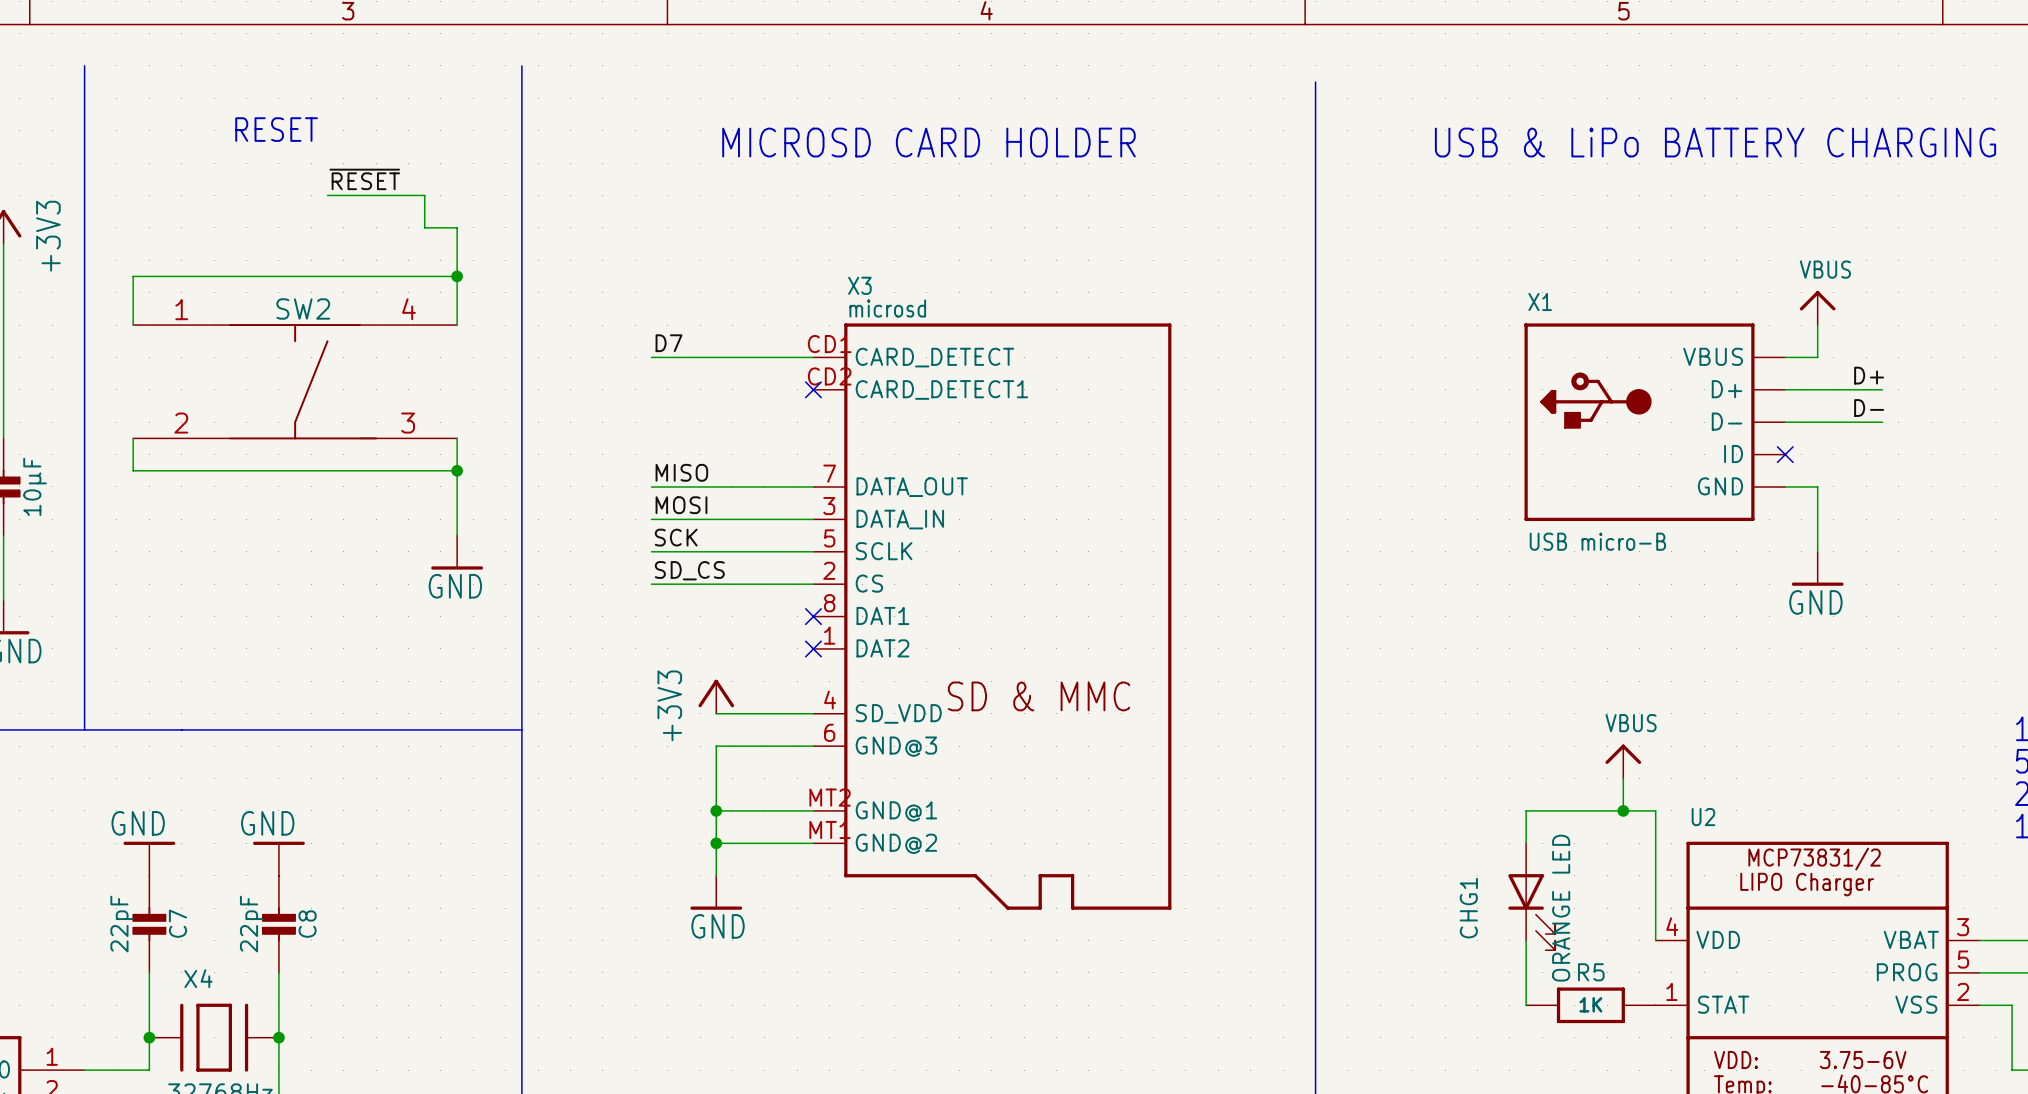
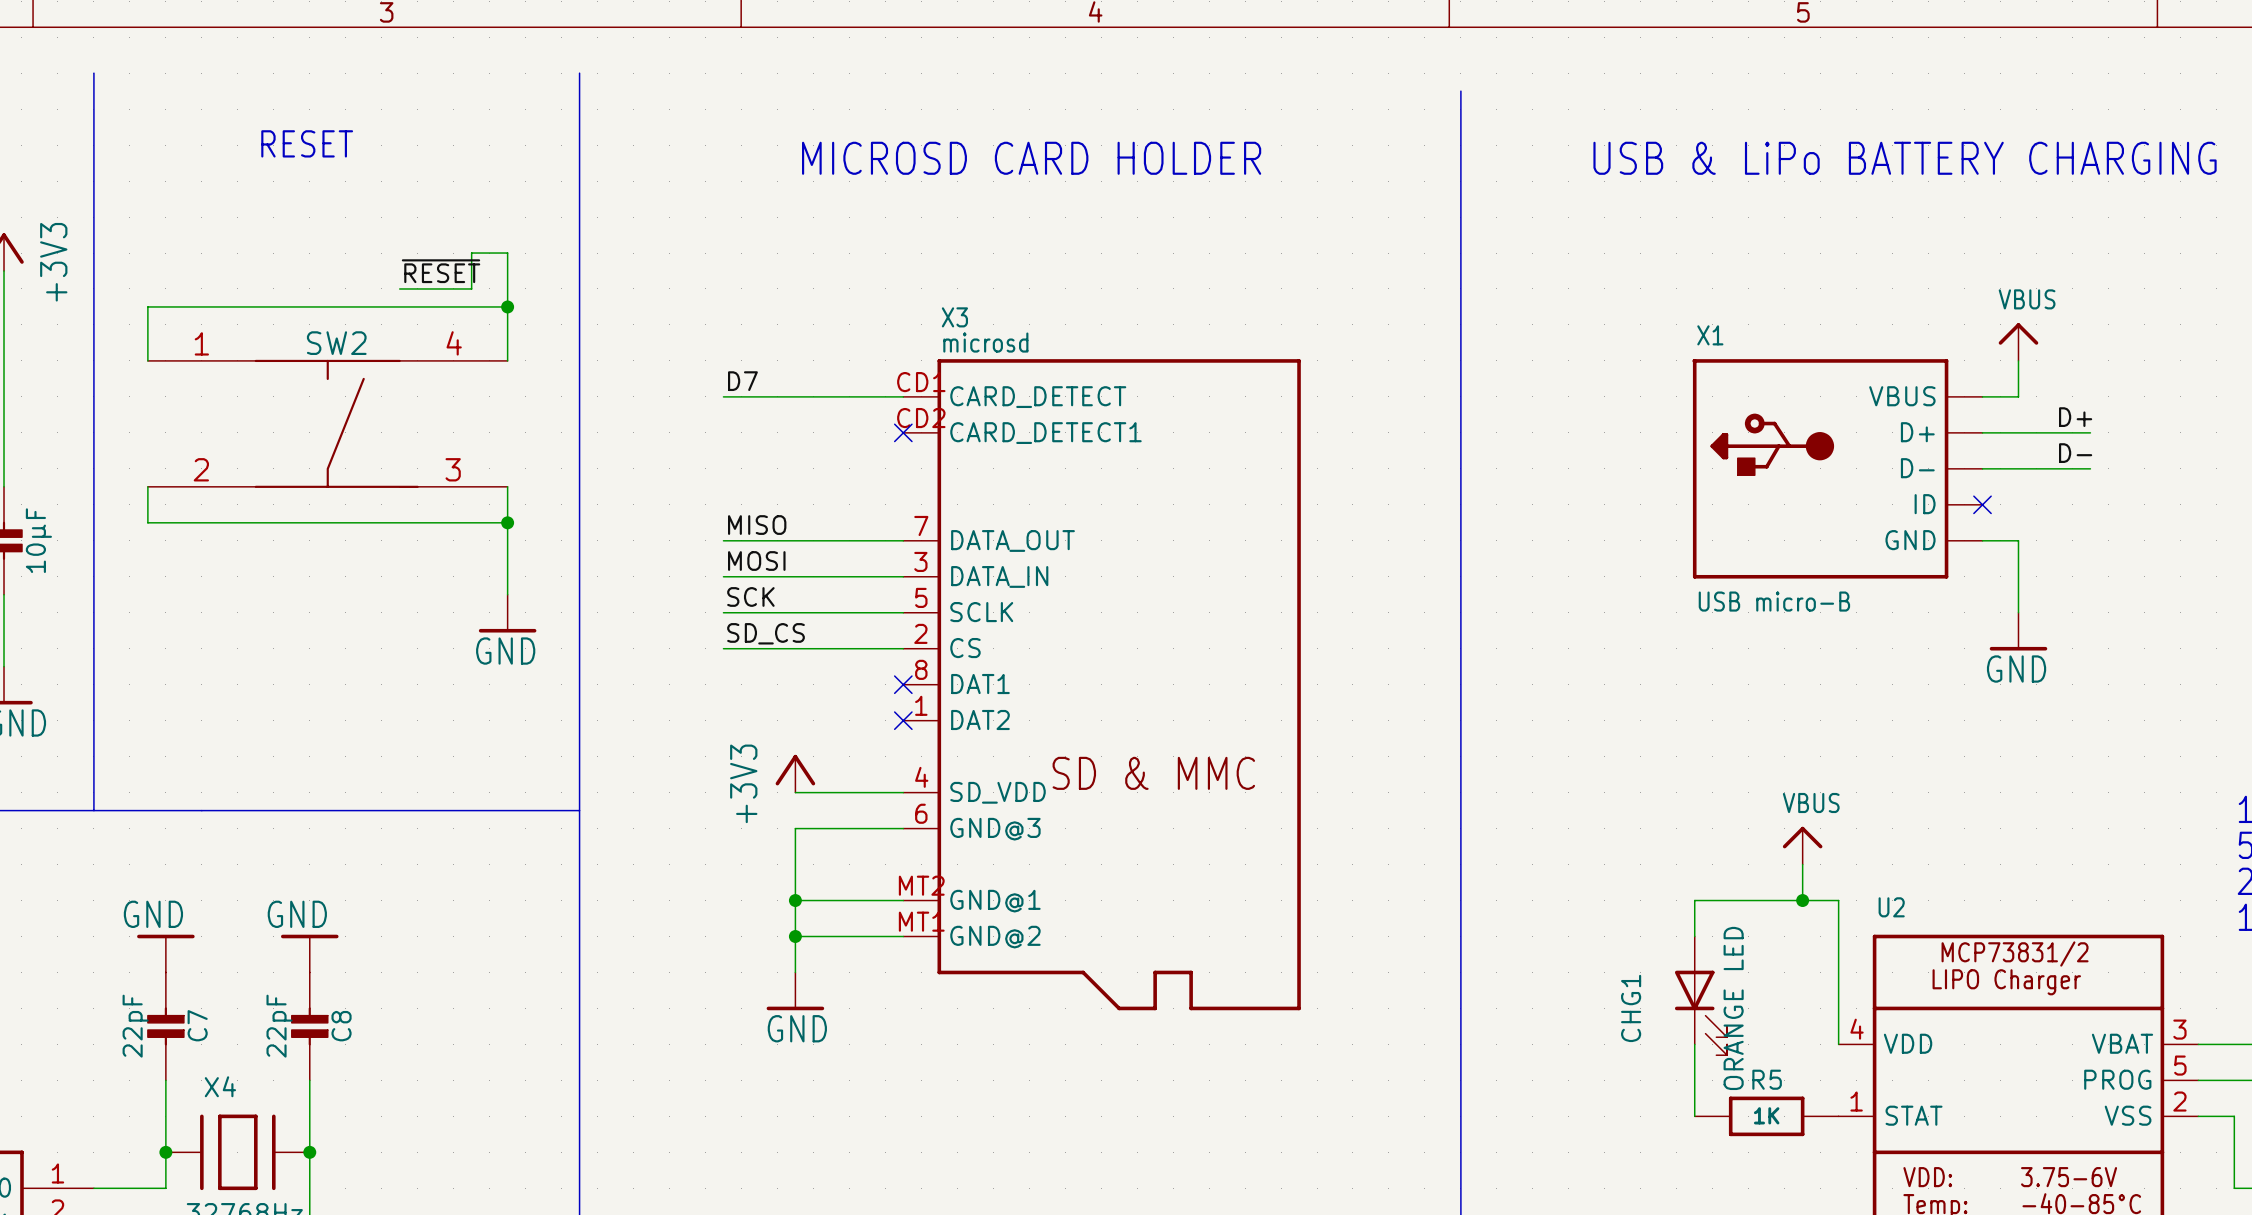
label position: ~{RESET} (364, 179) -> ~{RESET} (441, 271)
wire: (327, 195) (424, 195) (424, 227) -> (399, 288) (471, 288) (471, 253)

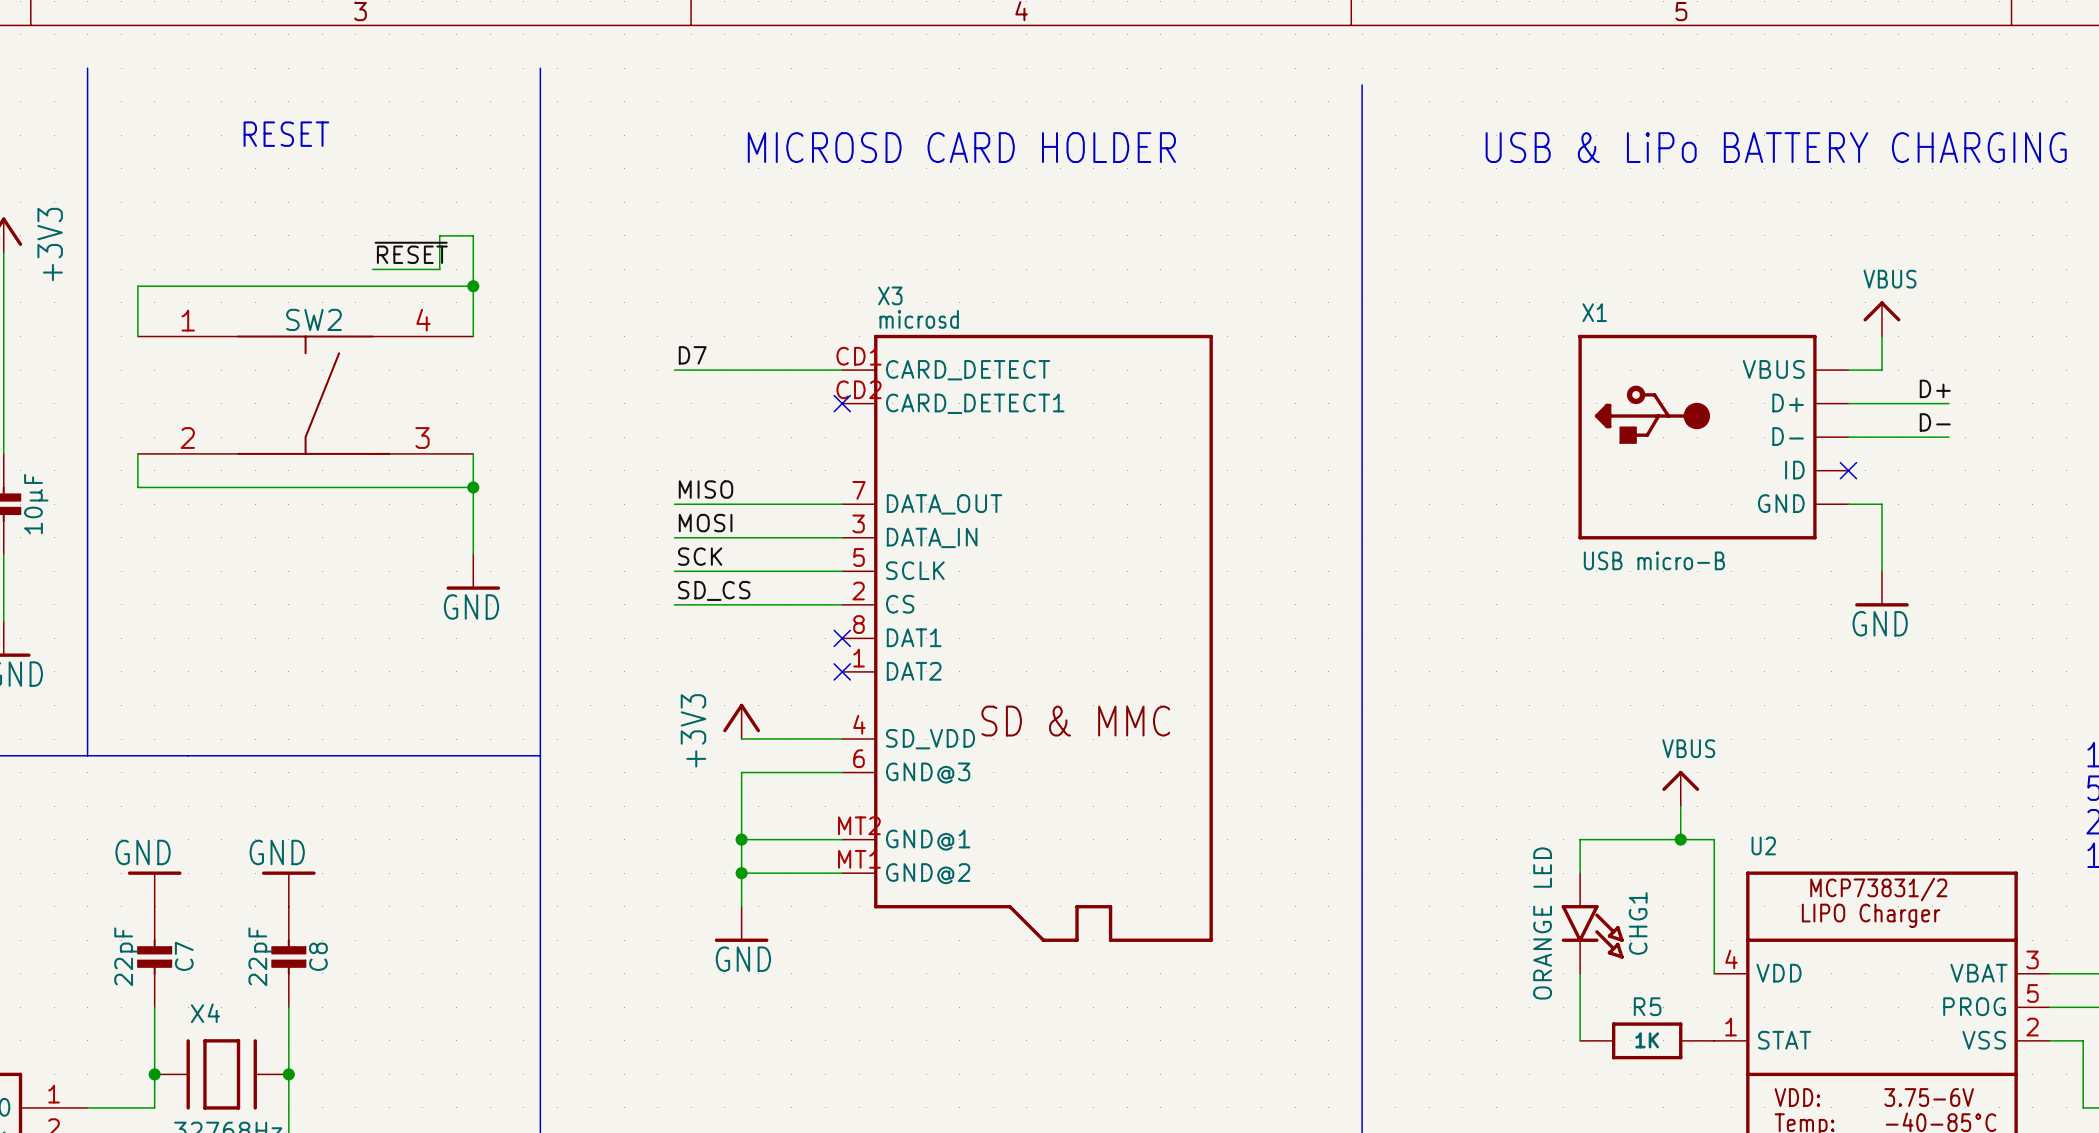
CHG1 symbol: [1674, 936, 1728, 1056] -> [1561, 873, 1624, 974]
CHG1 name position: CHG1 (1631, 1008) -> CHG1 (1638, 923)
CHG1 value position: ORANGE LED (1733, 1008) -> ORANGE LED (1542, 923)

